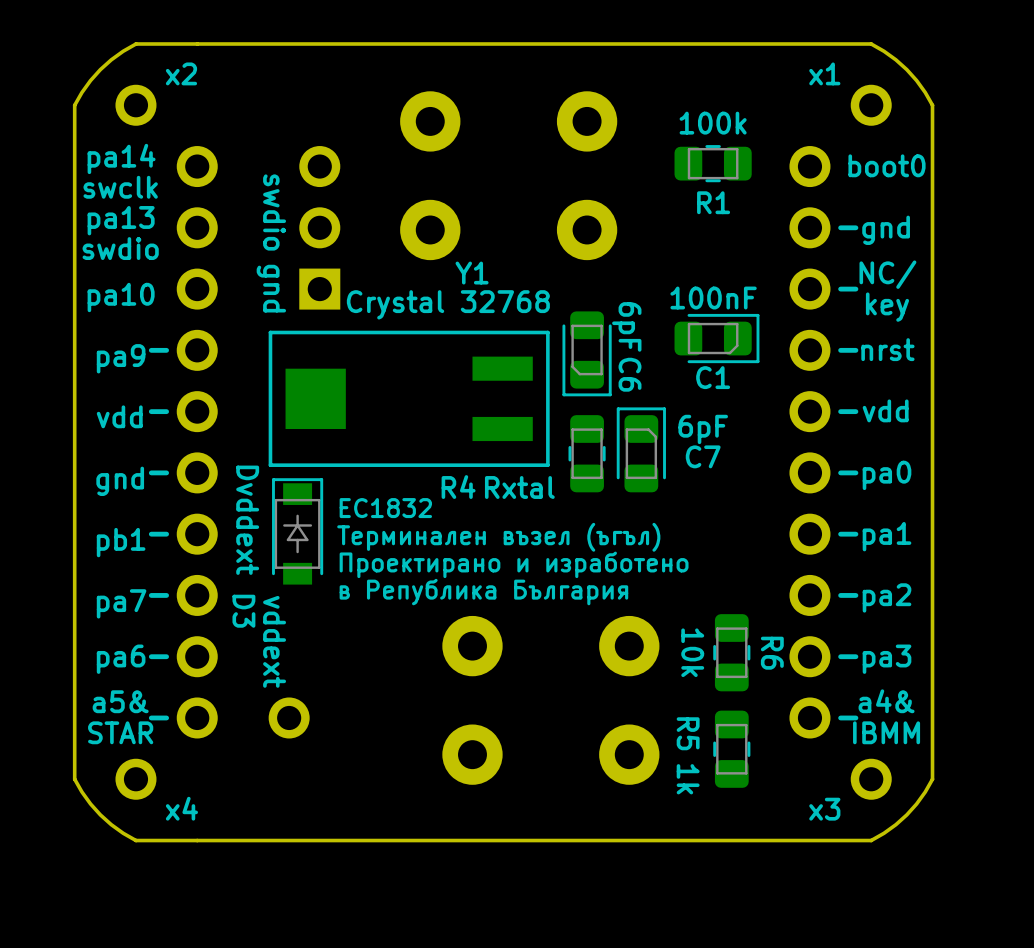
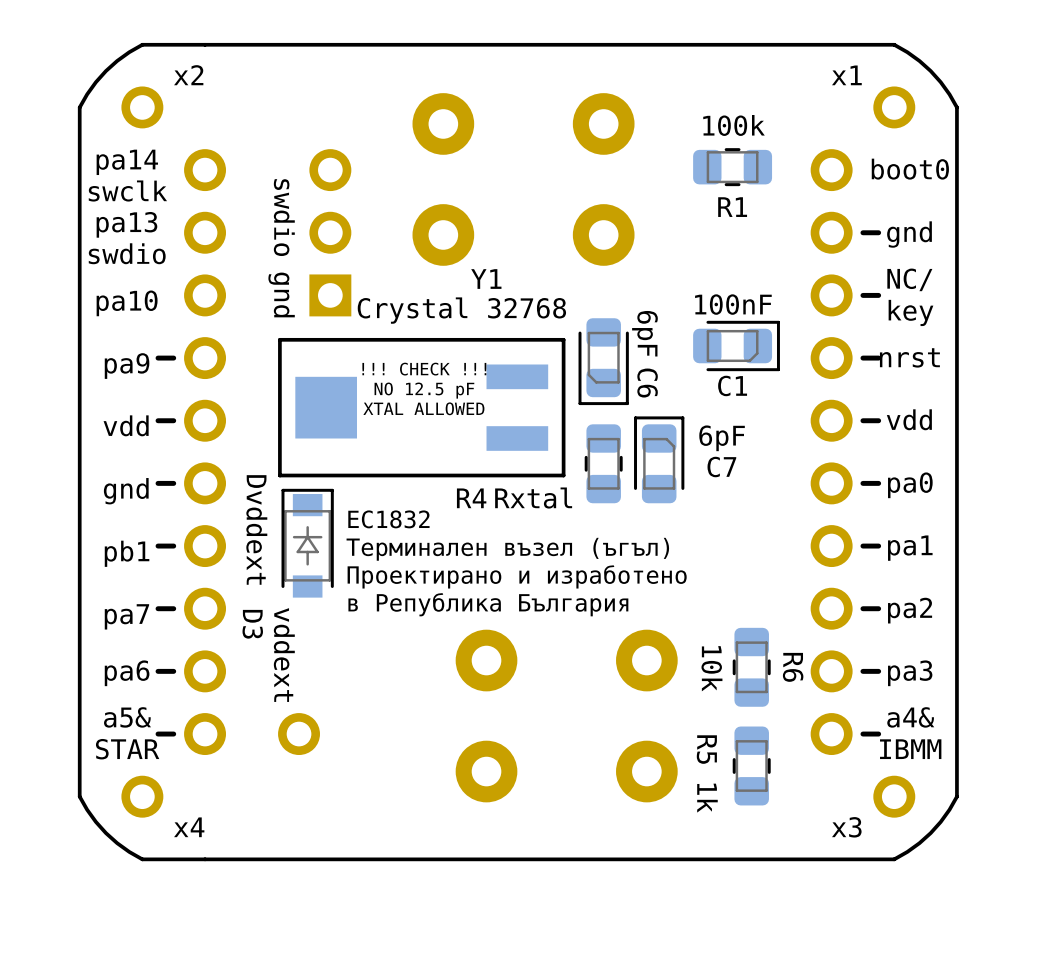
text: none -> !!! CHECK !!! (424, 369)
text: none -> NO 12.5 pF (424, 390)
text: none -> XTAL ALLOWED (423, 408)

